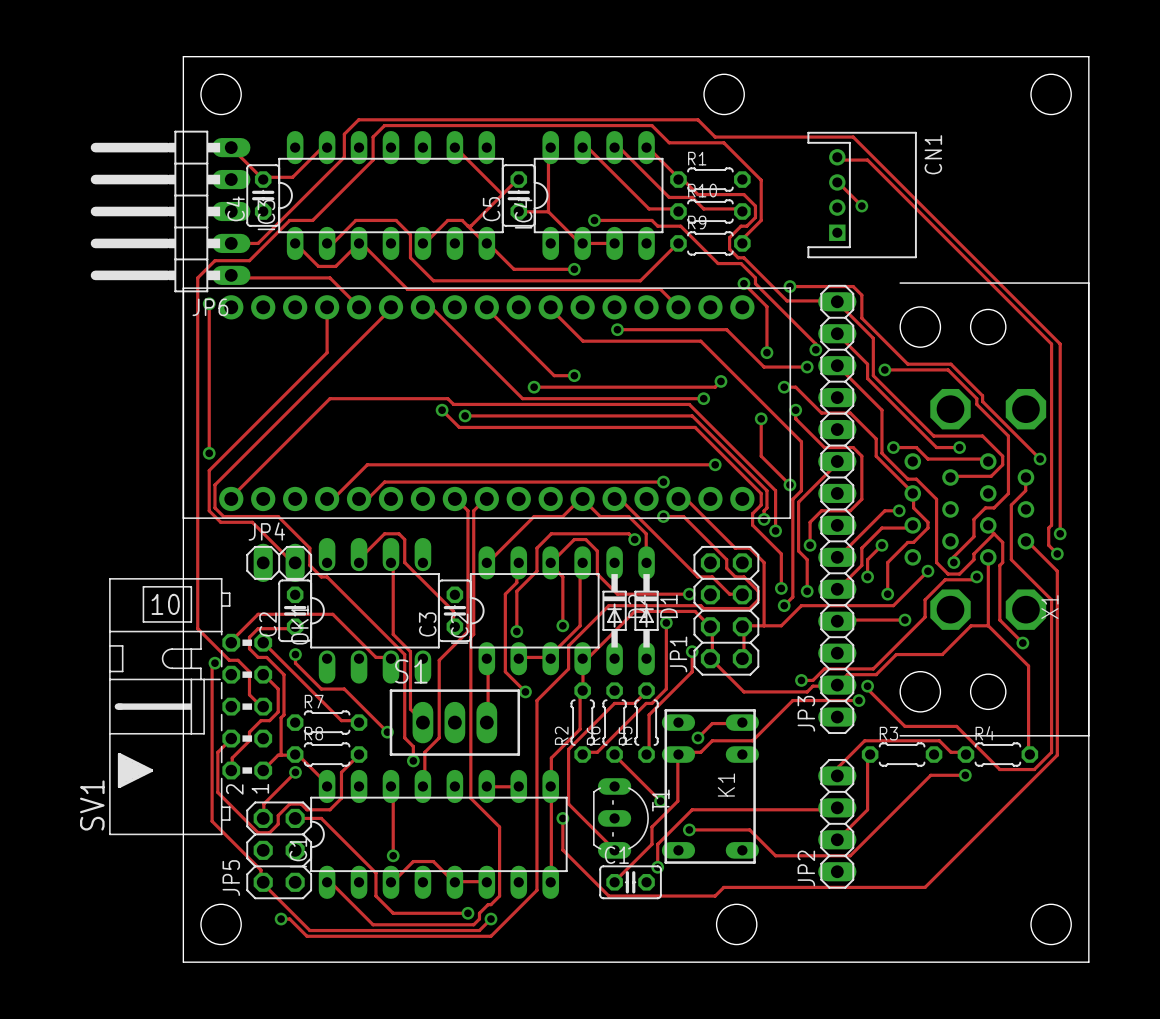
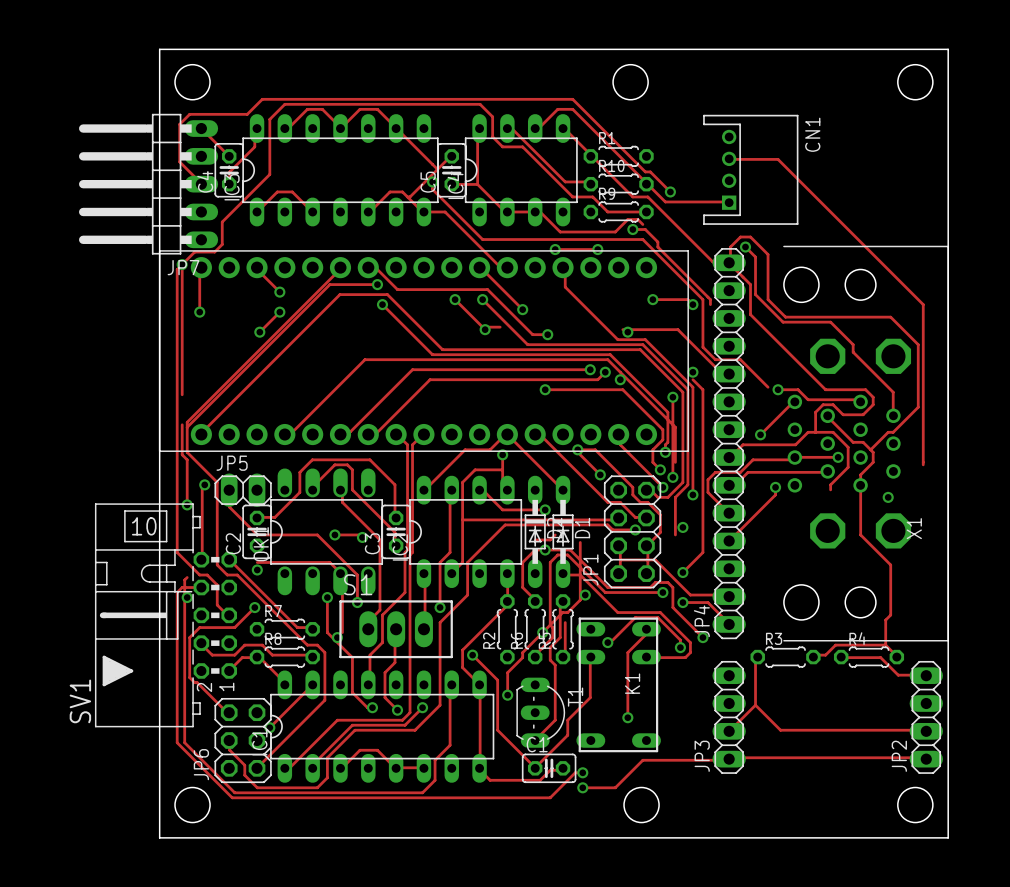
track: (358, 119) (352, 125) -> (359, 109) (340, 128) (322, 109) (307, 109)
track: (551, 119) (697, 119) (715, 137) (853, 137) (1060, 344) (1060, 349) -> none
track: (413, 125) (384, 125) (373, 137) (373, 160) (312, 220) (289, 220) -> (312, 104) (284, 104) (269, 119) (269, 174) (252, 191)
track: (433, 125) (640, 125) -> (377, 109) (396, 128)
track: (651, 125) (669, 142) (723, 142) (761, 180) (761, 220) (743, 237) (743, 243) (742, 243) -> (567, 109) (572, 109) (645, 181)
track: (344, 134) (344, 157) (258, 243) (231, 243) -> none
track: none -> (257, 128) (254, 129) (254, 146) (229, 171) (229, 184)
track: (327, 147) (321, 148) (292, 177) (263, 177) (263, 179) -> (284, 128) (284, 126) (289, 126) (299, 116)
track: (614, 147) (620, 148) (669, 197) (692, 197) (703, 208) (741, 208) -> (535, 128) (535, 126) (540, 126) (557, 109)
track: (837, 157) (838, 160) (867, 160) (1051, 344) (1051, 525) (1048, 528) (1048, 545) (1057, 553) -> none
track: (678, 179) (680, 177) (697, 194) (743, 194) (746, 197) -> (590, 156) (632, 196) (645, 196)
track: (838, 183) (861, 206) -> (730, 159) (778, 159) (923, 304)
track: none -> (650, 171) (645, 171) (572, 99) (262, 99) (247, 114) (189, 114) (179, 124) (179, 161) (201, 184)
track: (755, 206) (755, 217) (746, 226) (743, 226) -> (657, 179) (670, 191)
via: (861, 206) -> none
via: none -> (432, 181)
track: none -> (646, 184) (665, 201) (729, 202)
track: (594, 220) (651, 220) -> (480, 104) (492, 116) (492, 136) (502, 146) (522, 146) (567, 191)
via: (594, 220) -> none
via: none -> (670, 191)
track: (741, 226) (729, 237) (729, 249) (732, 252) -> (535, 211) (540, 211) (560, 232) (615, 232) (627, 219) (637, 219)
track: (295, 243) (318, 266) (335, 266) (358, 243) -> (257, 211) (277, 191) (292, 191) (312, 211)
track: (327, 243) (332, 243) (355, 220) (396, 220) (410, 234) (410, 257) (433, 280) (640, 280) (678, 243) -> none
track: (359, 243) (361, 243) (407, 289) (660, 289) (678, 307) -> none
track: (488, 243) (513, 269) (574, 269) -> (425, 211) (445, 211) (500, 267) (507, 267)
track: (697, 243) (718, 263) (726, 263) -> (607, 211) (646, 211)
track: (255, 254) (249, 260) (214, 260) (197, 277) (197, 628) (203, 634) -> (222, 222) (222, 244) (214, 252) (194, 252) (177, 269) (177, 552)
track: (738, 257) (743, 257) (787, 300) (818, 300) -> (647, 196) (712, 262)
via: (574, 269) -> none
track: (231, 275) (232, 277) (329, 277) (359, 307) -> none
track: (743, 283) (766, 306) (766, 352) -> none
via position: (743, 283) -> (632, 229)
via: none -> (745, 247)
track: none -> (555, 249) (597, 249)
via: none -> (555, 249)
via: none -> (597, 249)
track: (789, 286) (853, 286) (861, 295) (861, 318) (907, 364) -> (729, 262) (730, 247) (740, 237) (750, 237) (768, 254) (768, 299) (785, 317) (790, 317)
via: (789, 286) -> none
JP6 name: JP6 (210, 307) -> JP7 (183, 267)
track: none -> (201, 267) (199, 269) (199, 312)
track: none -> (257, 267) (279, 292)
track: (327, 307) (327, 352) (321, 358) -> none
track: (486, 307) (522, 344) -> none
track: (550, 307) (582, 341) (700, 341) (795, 436) -> (479, 267) (522, 309)
track: none -> (563, 267) (565, 269) (565, 287) (617, 339) (645, 339) (692, 387) (692, 494)
track: none -> (377, 284) (329, 284) (187, 427)
via: none -> (377, 284)
track: (861, 326) (873, 338) (873, 375) (933, 436) (982, 436) (994, 447) -> (835, 389) (865, 389)
track: (617, 329) (726, 329) (764, 367) (807, 367) -> none
via: (617, 329) -> none
track: (456, 332) (522, 398) (703, 398) -> (397, 289) (487, 289) (532, 334) (547, 334)
track: (837, 333) (867, 364) (867, 378) (936, 447) (948, 447) -> (750, 284) (750, 314) (825, 389)
via: none -> (279, 292)
via: none -> (455, 299)
track: none -> (482, 299) (527, 344) (642, 344) (687, 389) (687, 484) (675, 497) (675, 534)
via: none -> (482, 299)
track: none -> (652, 299) (687, 299) (692, 304)
via: none -> (652, 299)
via: none -> (382, 304)
via: none -> (692, 304)
via: (815, 349) -> none
via: (766, 352) -> none
via: none -> (522, 309)
via: none -> (199, 312)
via: none -> (279, 312)
track: (950, 364) (982, 395) (982, 401) (1040, 459) -> (828, 317) (890, 317) (918, 344) (918, 407) (893, 432) (888, 432)
track: (837, 365) (881, 410) (881, 453) (907, 479) (916, 479) (936, 499) (936, 562) (948, 574) (959, 574) (973, 559) (973, 553) (994, 533) -> none
via: (807, 367) -> none
track: (884, 369) (899, 369) -> (745, 247) (755, 257) (755, 294) (783, 322)
via: (884, 369) -> none
track: (948, 369) (976, 398) (976, 404) (1008, 436) (1008, 493) (994, 507) (991, 507) -> (825, 322) (830, 322) (853, 344) (853, 352) (893, 392) (893, 415)
via: (574, 375) -> none
via: none -> (485, 329)
track: none -> (622, 329) (677, 329) (720, 372) (727, 372) (729, 374)
track: (298, 381) (209, 470) (209, 487) -> none
via: none -> (259, 332)
track: (720, 381) (715, 387) (534, 387) -> none
via: none -> (547, 334)
via: (534, 387) -> none
track: (784, 387) (795, 387) (807, 398) -> (432, 181) (432, 189) (482, 239) (642, 239) (702, 299) (702, 347)
via: (784, 387) -> none
track: (329, 398) (447, 398) (453, 404) (689, 404) (697, 413) -> (287, 347) (339, 294) (387, 294) (442, 349) (640, 349) (682, 392) (682, 482) (667, 497) (657, 497) (652, 492) (647, 492) (646, 490)
via: (703, 398) -> none
track: (442, 410) (459, 427) (695, 427) (715, 447) -> (545, 389) (622, 389)
via: (442, 410) -> none
track: (795, 410) (795, 418) (824, 447) (853, 447) (861, 456) (861, 499) (850, 510) (821, 510) (810, 522) (810, 545) -> none
via position: (795, 410) -> (692, 372)
track: (465, 415) (692, 415) (766, 490) -> (382, 304) (432, 354) (610, 354) (667, 412) (667, 427)
via: (465, 415) -> none
track: (761, 418) (761, 456) (789, 484) -> none
via: (761, 418) -> none
track: none -> (590, 369) (412, 369) (349, 432) (342, 432) (340, 434)
via: none -> (590, 369)
track: none -> (605, 372) (597, 379) (430, 379) (377, 432) (369, 432) (368, 434)
via: none -> (605, 372)
via: none -> (620, 379)
track: (876, 438) (876, 456) (913, 493) (913, 507) (927, 522) (927, 528) (913, 542) -> (763, 382) (768, 387)
track: (801, 441) (801, 490) (792, 499) (792, 597) (784, 605) -> none
via: none -> (545, 389)
via: (959, 447) -> none
via: (209, 453) -> none
track: none -> (672, 397) (672, 477)
via: none -> (672, 397)
via: (1040, 459) -> none
track: (837, 461) (838, 461) (798, 502) (798, 551) (807, 559) -> (697, 384) (702, 389) (702, 487)
track: none -> (794, 401) (760, 434)
track: (367, 464) (715, 464) -> (319, 404) (364, 359) (607, 359)
via: (715, 464) -> none
track: (968, 476) (950, 477) -> (843, 414) (833, 404) (823, 404) (815, 412) (815, 432)
track: (1025, 477) (1025, 490) (1019, 496) -> none
track: (663, 482) (384, 482) (370, 496) (361, 496) (359, 498) -> none
via: (663, 482) -> none
via: (789, 484) -> none
track: (680, 499) (686, 499) (735, 548) (749, 548) -> (618, 434) (620, 434) (620, 444) (652, 477)
via: none -> (760, 434)
track: (1011, 505) (1011, 559) (1051, 599) (1051, 752) (1034, 769) (999, 769) (956, 726) (904, 726) (867, 689) (867, 686) -> (880, 439) (870, 449)
track: (214, 507) (223, 516) (278, 516) (309, 548) (309, 565) (321, 576) (327, 576) (364, 614) -> (187, 442) (187, 452) (217, 482) (217, 554)
track: (985, 507) (973, 519) -> (858, 442) (853, 442) (827, 415)
track: none -> (863, 442) (873, 452) (873, 462) (860, 474) (860, 485)
track: (209, 510) (220, 522) (252, 522) (292, 562) (295, 562) -> (182, 444) (182, 454) (187, 459) (187, 504)
track: (884, 510) (838, 556) -> (770, 444) (743, 444) (729, 457)
track: none -> (783, 444) (795, 444) (808, 432) (833, 432) (848, 447) (848, 452)
via: (899, 510) -> none
track: (752, 513) (752, 525) (781, 553) (781, 588) -> (655, 447) (652, 449) (652, 462) (660, 469)
track: (600, 516) (628, 516) (646, 533) (646, 562) -> (522, 449) (562, 489)
track: none -> (502, 454) (502, 487) (507, 490)
via: none -> (502, 454)
track: none -> (580, 454) (600, 474)
track: none -> (838, 457) (794, 457)
via: none -> (838, 457)
track: (988, 525) (988, 528) (1002, 542) (1002, 562) (999, 565) (999, 620) (1022, 643) -> none
track: (881, 528) (861, 548) (861, 565) (837, 589) -> (768, 459) (753, 459) (740, 472) (715, 472) (707, 479) (707, 492) (729, 513)
via: (775, 530) -> none
JP4 name: JP4 (266, 531) -> JP5 (232, 463)
via: (1060, 533) -> none
track: (545, 539) (551, 533) (628, 533) (634, 539) -> none
track: (574, 539) (550, 562) -> (500, 469) (475, 469)
track: (577, 539) (585, 539) (597, 551) (597, 574) (617, 594) (689, 594) -> none
via: (634, 539) -> none
via: none -> (660, 469)
track: none -> (827, 471) (795, 472)
track: (1025, 541) (1057, 571) (1057, 755) (925, 887) (723, 887) -> (926, 759) (730, 757) (727, 760) (642, 760) (630, 772)
track: (907, 542) (887, 562) (887, 594) -> (790, 472) (748, 472) (735, 484) (730, 484)
via: none -> (600, 474)
via: (810, 545) -> none
track: (881, 545) (867, 559) (867, 576) -> none
via: (881, 545) -> none
track: (536, 548) (536, 571) (516, 591) -> (450, 507) (450, 514)
via: none -> (672, 477)
via: (1057, 553) -> none
track: none -> (204, 484) (202, 487) (202, 557)
via: none -> (204, 484)
track: (761, 559) (764, 562) (764, 625) -> none
via: none -> (662, 487)
via: none -> (775, 487)
track: (582, 562) (580, 565) (580, 625) (548, 657) (519, 657) -> (467, 477) (462, 482) (462, 562) (452, 572)
via: (953, 562) -> none
track: (551, 565) (562, 576) (562, 625) -> (480, 492) (485, 492) (502, 509) (545, 509)
via: none -> (692, 494)
track: (927, 571) (893, 605) (801, 605) (781, 625) (743, 625) -> none
via: (927, 571) -> none
via: none -> (888, 497)
track: (393, 576) (393, 634) (410, 651) (410, 660) -> (342, 502) (379, 539) (379, 610) (369, 620) (368, 629)
via: (867, 576) -> none
track: (976, 576) (973, 579) (945, 579) (925, 599) (925, 617) (873, 668) (824, 668) (812, 680) (801, 680) -> none
via: (976, 576) -> none
via: none -> (187, 504)
track: (516, 582) (505, 594) (505, 645) -> (450, 549) (450, 552) (440, 562)
via: none -> (545, 509)
via: (781, 588) -> none
track: none -> (702, 514) (702, 552) (682, 572)
via: (807, 591) -> none
track: none -> (257, 517) (274, 517) (299, 492) (299, 472) (312, 459) (369, 459) (395, 484) (396, 517)
via: (689, 594) -> none
track: none -> (618, 517) (617, 519) (462, 519)
via: (887, 594) -> none
track: (758, 599) (749, 608) (729, 608) -> (660, 522) (660, 532) (647, 544)
track: (700, 605) (608, 605) (568, 645) (568, 668) (536, 700) (536, 890) (490, 936) (306, 936) (289, 919) (281, 919) -> (610, 527) (607, 524) (505, 524) (467, 562) (467, 595) (440, 622) (440, 705) (415, 730) (354, 730) (327, 757) (327, 760)
via: none -> (635, 529)
track: (295, 614) (258, 614) (232, 640) -> (257, 534) (229, 507) (229, 490)
track: (332, 614) (375, 657) (390, 657) -> (257, 562) (329, 562) (339, 572)
track: none -> (289, 534) (317, 534)
track: none -> (334, 534) (359, 534) (362, 537)
via: none -> (334, 534)
track: none -> (555, 534) (550, 539) (535, 539)
track: (988, 614) (988, 625) -> (860, 534) (890, 564) (890, 615) (885, 620) (885, 645)
via: none -> (362, 537)
track: (838, 620) (904, 620) -> (730, 539) (775, 494) (775, 487)
via: (904, 620) -> none
via: (666, 622) -> none
via: (562, 625) -> none
track: (988, 625) (1028, 666) (1028, 752) -> (885, 645) (895, 655)
track: (988, 625) (971, 625) (942, 654) (896, 654) (876, 674) (847, 674) (835, 686) (812, 686) (807, 691) -> (729, 624) (707, 602) (702, 602)
track: (295, 626) (292, 628) (258, 628) (249, 637) -> none
track: (710, 626) (695, 611) (634, 611) (614, 631) -> (702, 637) (672, 607) (672, 587) (667, 582) (655, 582) (650, 587) (607, 587) (570, 549) (535, 549)
via: (516, 631) -> none
via: none -> (545, 549)
track: (465, 634) (439, 660) (439, 706) -> (405, 552) (405, 592) (382, 615)
track: none -> (620, 559) (655, 559) (690, 595) (727, 595) (729, 596)
via: (1022, 643) -> none
track: (600, 645) (588, 657) (582, 658) -> (522, 562) (522, 587) (535, 601)
track: (692, 651) (692, 671) (649, 714) -> none
via: (692, 651) -> none
track: (295, 654) (295, 663) (321, 689) (344, 689) (387, 732) -> none
track: (404, 654) (404, 737) (413, 746) (413, 760) -> (352, 570) (357, 575)
track: (258, 657) (266, 657) (283, 674) (281, 755) -> (224, 572) (227, 575) (237, 575) (307, 645) (317, 645) (324, 652) (324, 700) (257, 768)
via: none -> (682, 572)
track: none -> (340, 573) (342, 575) (342, 632)
track: none -> (563, 573) (580, 575) (617, 612) (660, 612) (690, 642) (690, 652) (685, 657) (646, 657)
track: (710, 658) (743, 691) (784, 691) -> none
via position: (214, 663) -> (187, 597)
track: (505, 671) (525, 691) -> (440, 585) (440, 607)
track: none -> (201, 587) (182, 587) (177, 592) (177, 742) (232, 797) (550, 797) (575, 772) (582, 772)
track: (263, 674) (278, 689) (278, 712) -> (254, 607) (242, 620)
via: none -> (662, 592)
via: (801, 680) -> none
via: none -> (585, 595)
track: none -> (327, 597) (327, 632) (352, 657) (352, 692) (367, 707) (372, 707)
via: none -> (327, 597)
via: (867, 686) -> none
track: (410, 691) (410, 709) (422, 722) -> none
via: none -> (357, 602)
via position: (525, 691) -> (440, 607)
via: none -> (682, 602)
track: (643, 694) (634, 703) (614, 703) (568, 749) (568, 804) (614, 850) -> (560, 605) (560, 637) (550, 647) (550, 660) (555, 665) (555, 720) (535, 740)
via: none -> (254, 607)
track: (580, 697) (580, 729) (551, 758) (550, 786) -> (505, 607) (462, 650) (462, 667) (479, 684)
track: (858, 700) (792, 700) (752, 740) (712, 740) (700, 752) (680, 752) (678, 754) -> none
via: (858, 700) -> none
JP3 name: JP3 (806, 713) -> JP4 (701, 621)
track: (260, 720) (249, 732) (249, 740) (232, 758) (231, 770) -> (227, 627) (199, 627) (189, 637) (189, 655)
track: none -> (396, 629) (395, 662) (384, 672) (384, 697) (397, 710)
track: (741, 723) (712, 723) (697, 737) -> (645, 630) (645, 635) (627, 652) (627, 717)
via: none -> (542, 632)
via: none -> (702, 637)
track: none -> (612, 640) (635, 617) (657, 617) (680, 640) (680, 647)
track: (231, 738) (217, 752) -> none
track: none -> (885, 645) (835, 645) (825, 655) (815, 655) (813, 657)
via: none -> (680, 647)
track: (600, 749) (597, 752) (582, 752) (582, 754) -> (522, 652) (522, 657) (507, 672) (507, 695)
track: none -> (472, 655) (497, 680) (497, 730) (535, 767)
via: none -> (472, 655)
track: (359, 754) (341, 772) (341, 798) (329, 809) (306, 809) (301, 804) (289, 804) (278, 815) (278, 824) (269, 832) (258, 832) (217, 792) (217, 778) -> (312, 657) (312, 655) (272, 655) (262, 645) (244, 645) (234, 655) (212, 655) (201, 643)
track: (614, 754) (660, 801) -> (535, 657) (552, 637) (552, 627) (550, 625) (550, 562) (557, 554) (567, 554) (605, 592) (662, 592)
track: (965, 754) (965, 752) (950, 752) (939, 740) (864, 740) (838, 766) (837, 775) -> (841, 657) (880, 657) (898, 675) (926, 675)
via: (413, 760) -> none
track: (295, 772) (263, 804) (263, 818) -> (189, 677) (229, 712)
via: (295, 772) -> none
track: (965, 775) (930, 775) (850, 855) (775, 855) (749, 829) (689, 829) -> none
via: (965, 775) -> none
track: none -> (312, 684) (269, 727)
track: (390, 786) (393, 786) (393, 855) -> none
track: (486, 786) (516, 786) -> none
track: (470, 798) (499, 827) (499, 873) -> (450, 685) (450, 745) (435, 760)
via: (660, 801) -> none
track: (837, 807) (835, 809) (692, 809) (657, 844) (657, 867) -> none
track: none -> (755, 705) (780, 730) (926, 731)
via: none -> (372, 707)
track: none -> (422, 707) (405, 725) (352, 725) (314, 762) (314, 767) (312, 768)
via: none -> (422, 707)
via: none -> (397, 710)
track: (295, 818) (321, 818) (375, 873) -> none
track: (562, 818) (562, 850) (608, 896) -> (479, 768) (490, 780) (530, 780)
via position: (562, 818) -> (507, 695)
track: (212, 821) (260, 870) (260, 881) (309, 930) (479, 930) (490, 919) -> (184, 715) (184, 742) (234, 792) (422, 792) (427, 787)
JP2: none -> (926, 717)
via: none -> (627, 717)
via: (689, 829) -> none
via: none -> (269, 727)
via: (393, 855) -> none
via: (657, 867) -> none
JP2 name: JP2 (806, 868) -> JP3 (702, 756)
JP5 name: JP5 (231, 878) -> JP6 (201, 764)
track: (327, 882) (327, 884) (332, 884) (373, 924) (473, 924) (479, 919) (479, 913) (488, 904) (490, 904) -> (284, 768) (289, 767) (337, 720) (402, 720) (410, 712) (410, 695)
track: none -> (563, 768) (562, 770) (550, 770) (540, 780)
via: none -> (582, 772)
track: (375, 893) (375, 896) (393, 913) (467, 913) -> (327, 777) (317, 787) (257, 787) (244, 775) (244, 765) (229, 750) (229, 740)
track: (620, 896) (715, 896) -> (582, 787) (615, 787) (622, 780)
via: none -> (582, 787)
via: (467, 913) -> none
via: (281, 919) -> none
via: (490, 919) -> none

